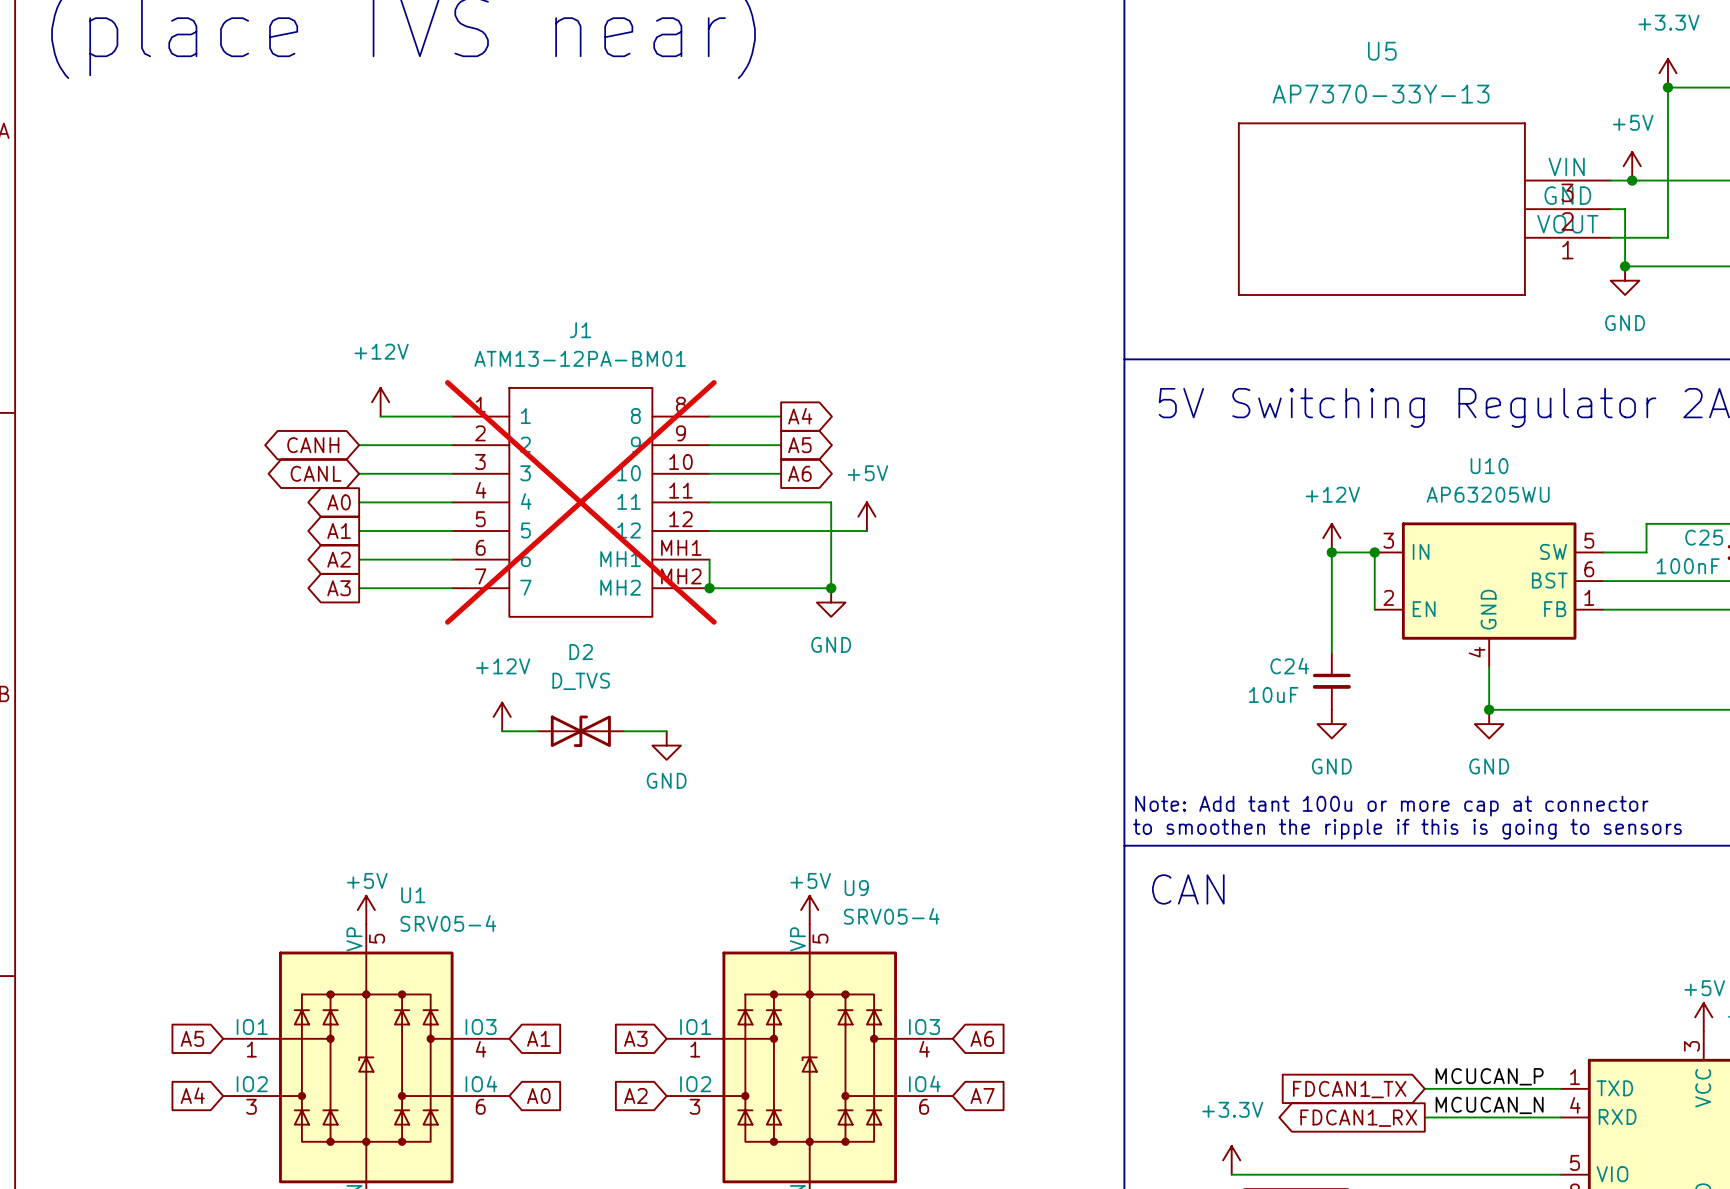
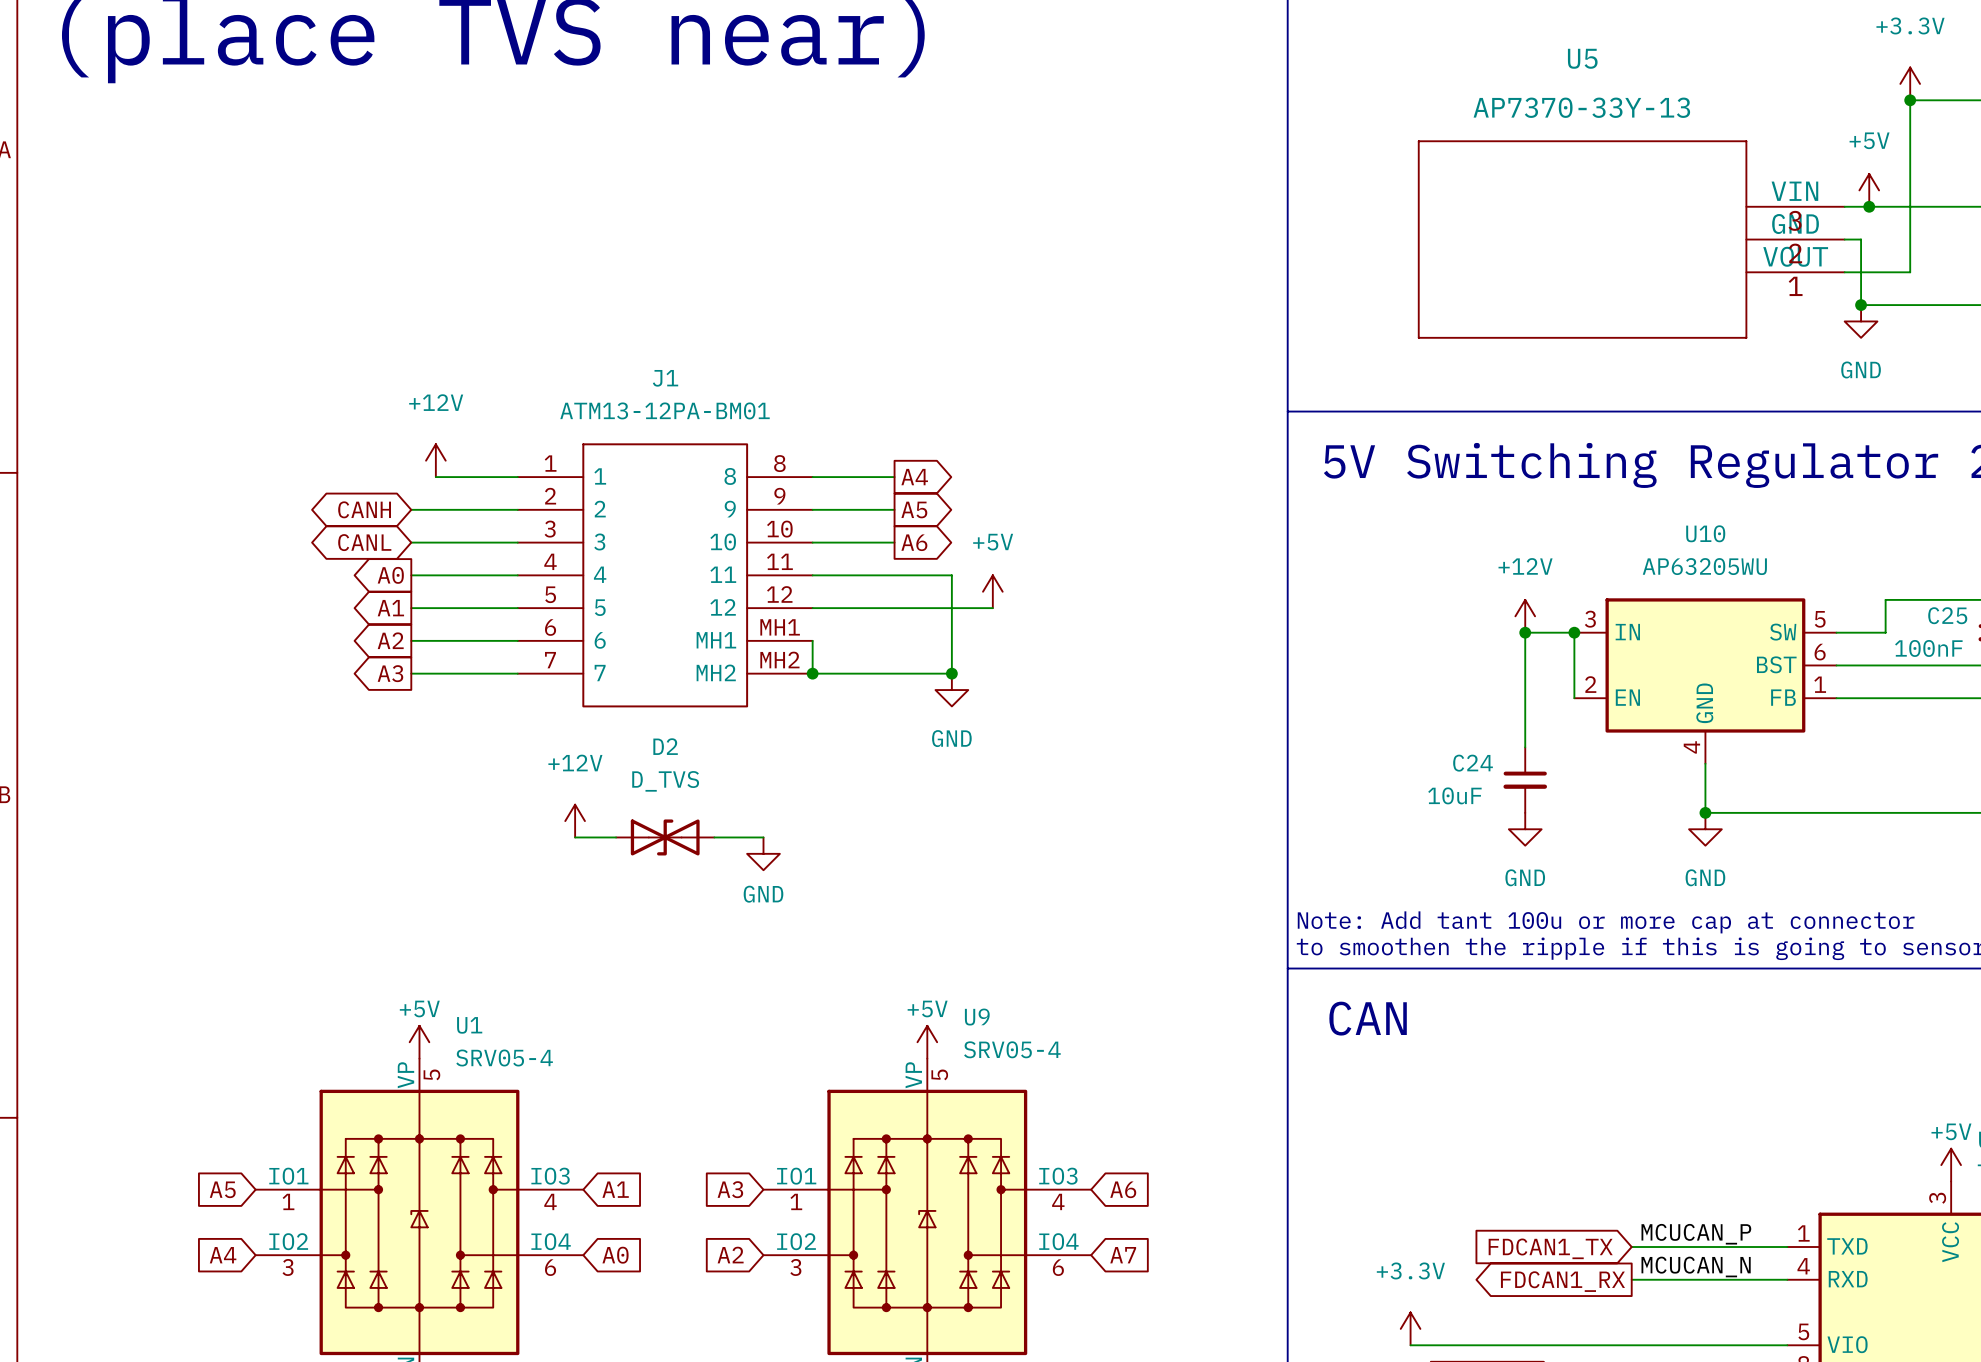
J1 do-not-place cross: (580, 502) -> none

